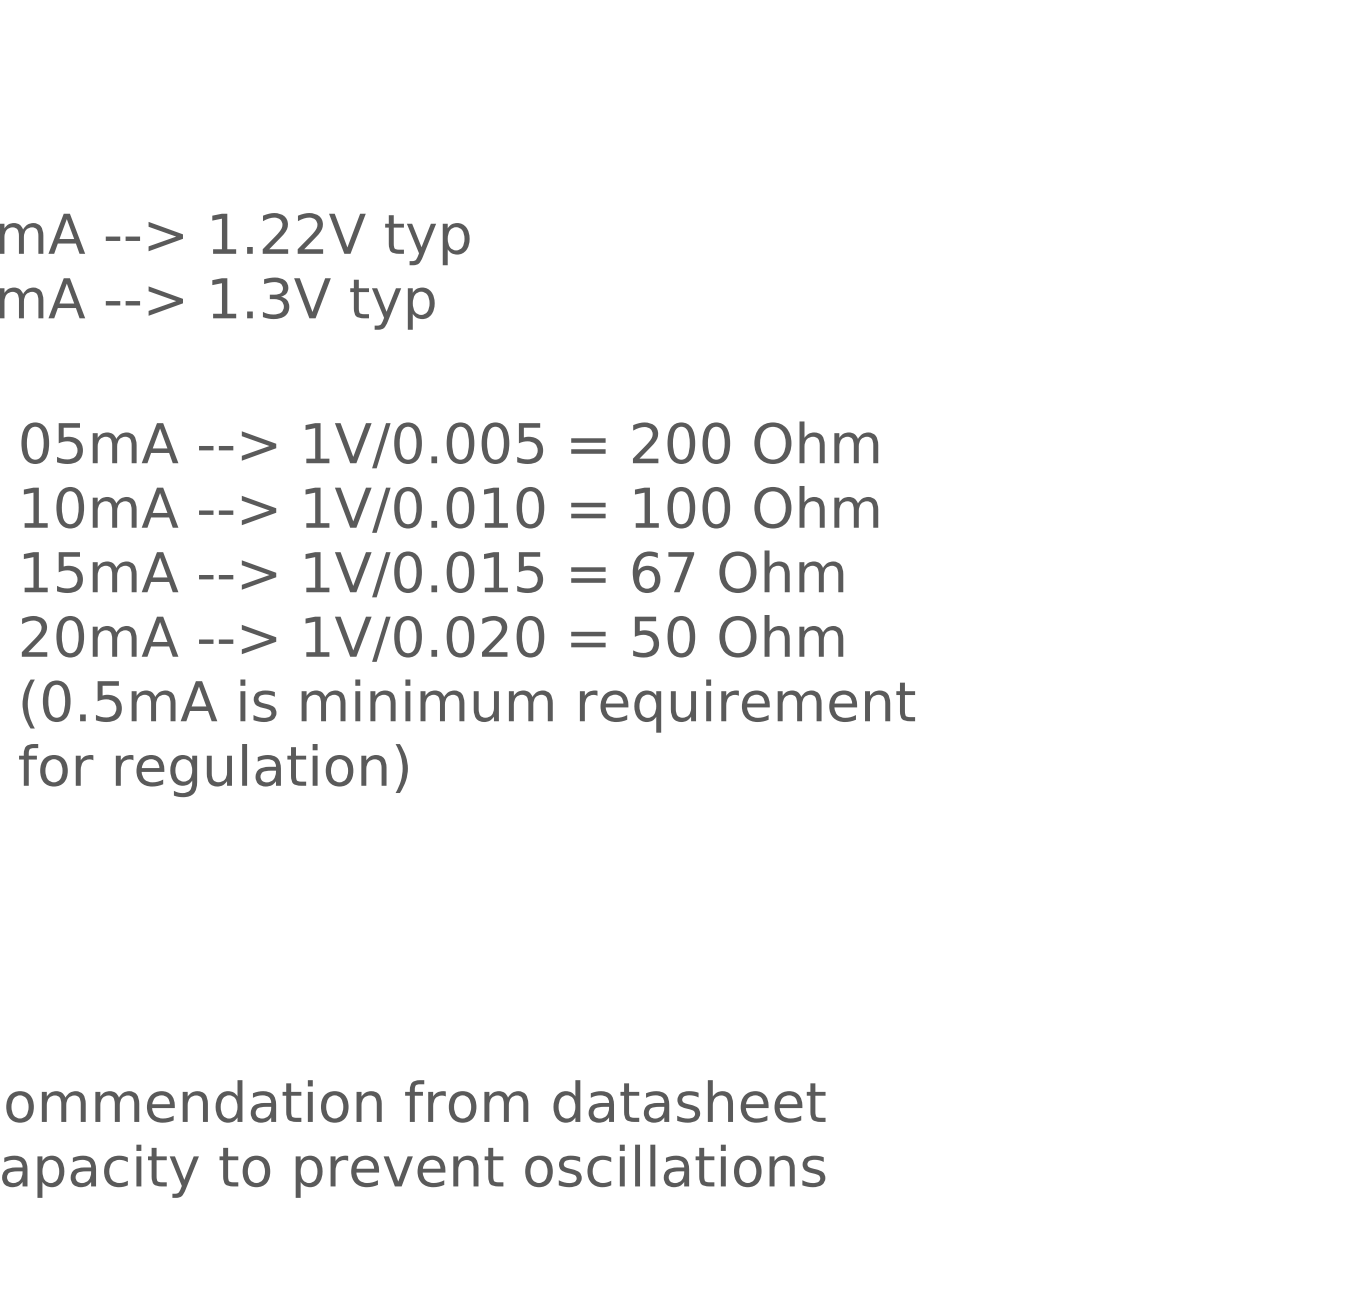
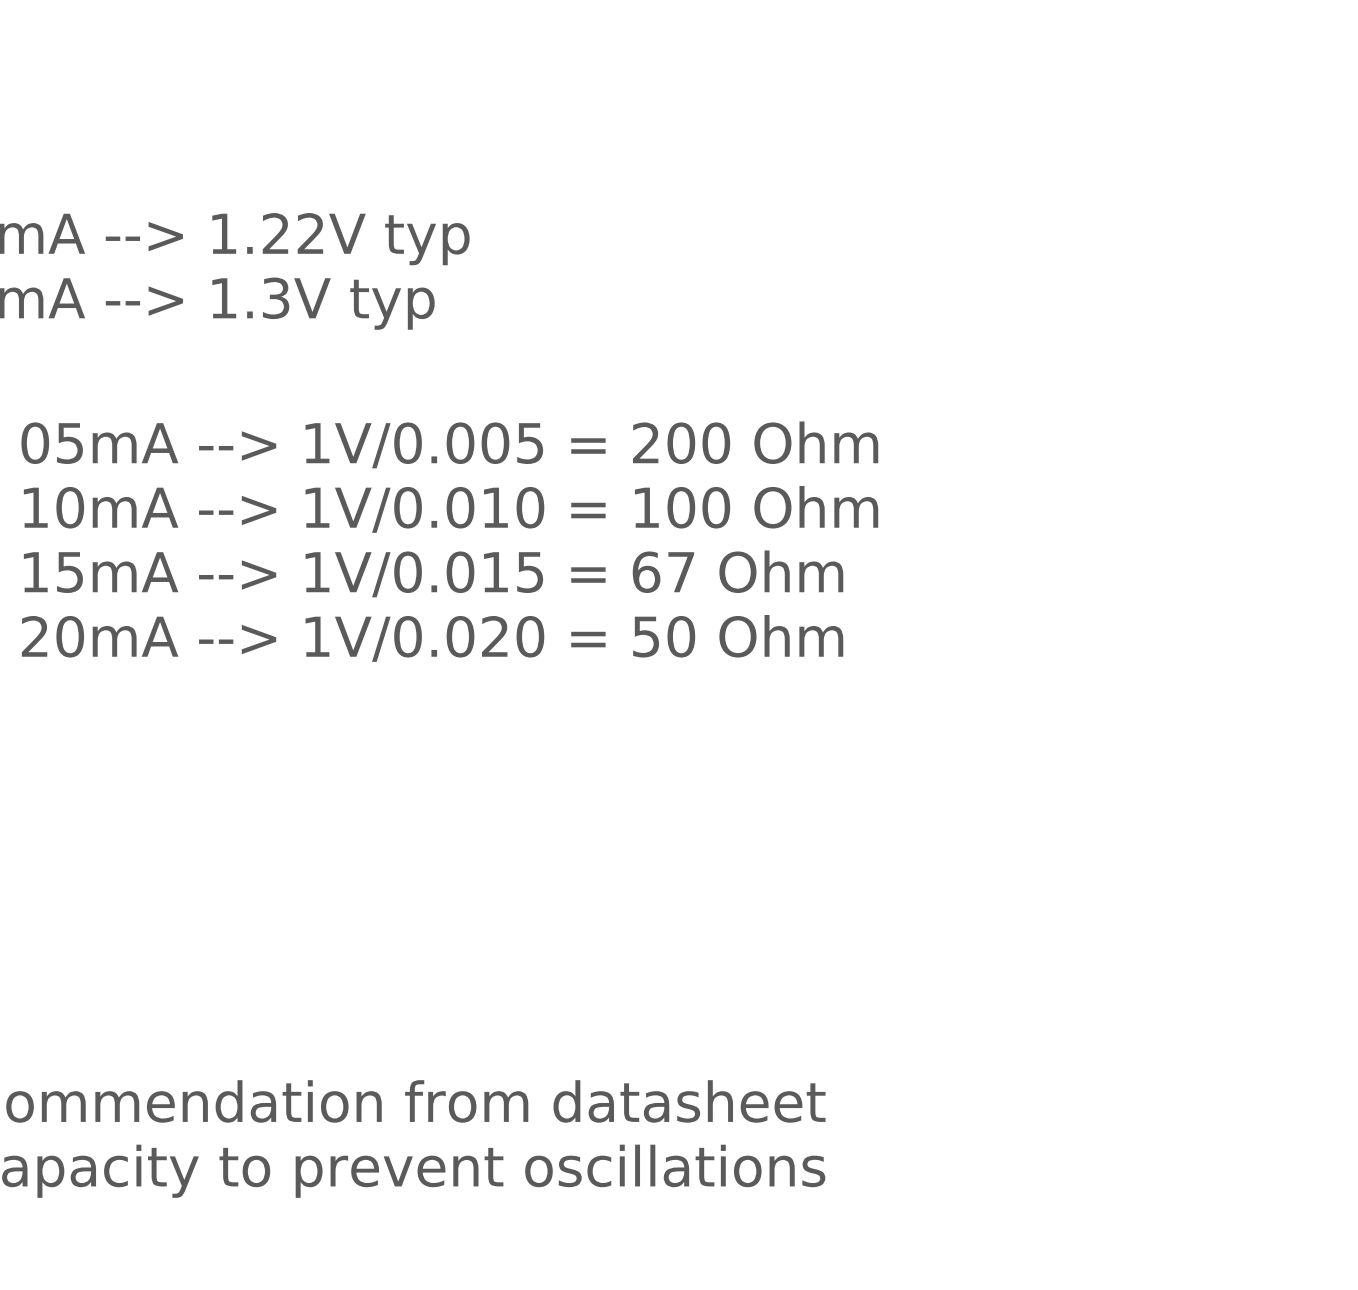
text: (0.5mA is minimum requirement (468, 706) -> none
text: for regulation) (213, 770) -> none

